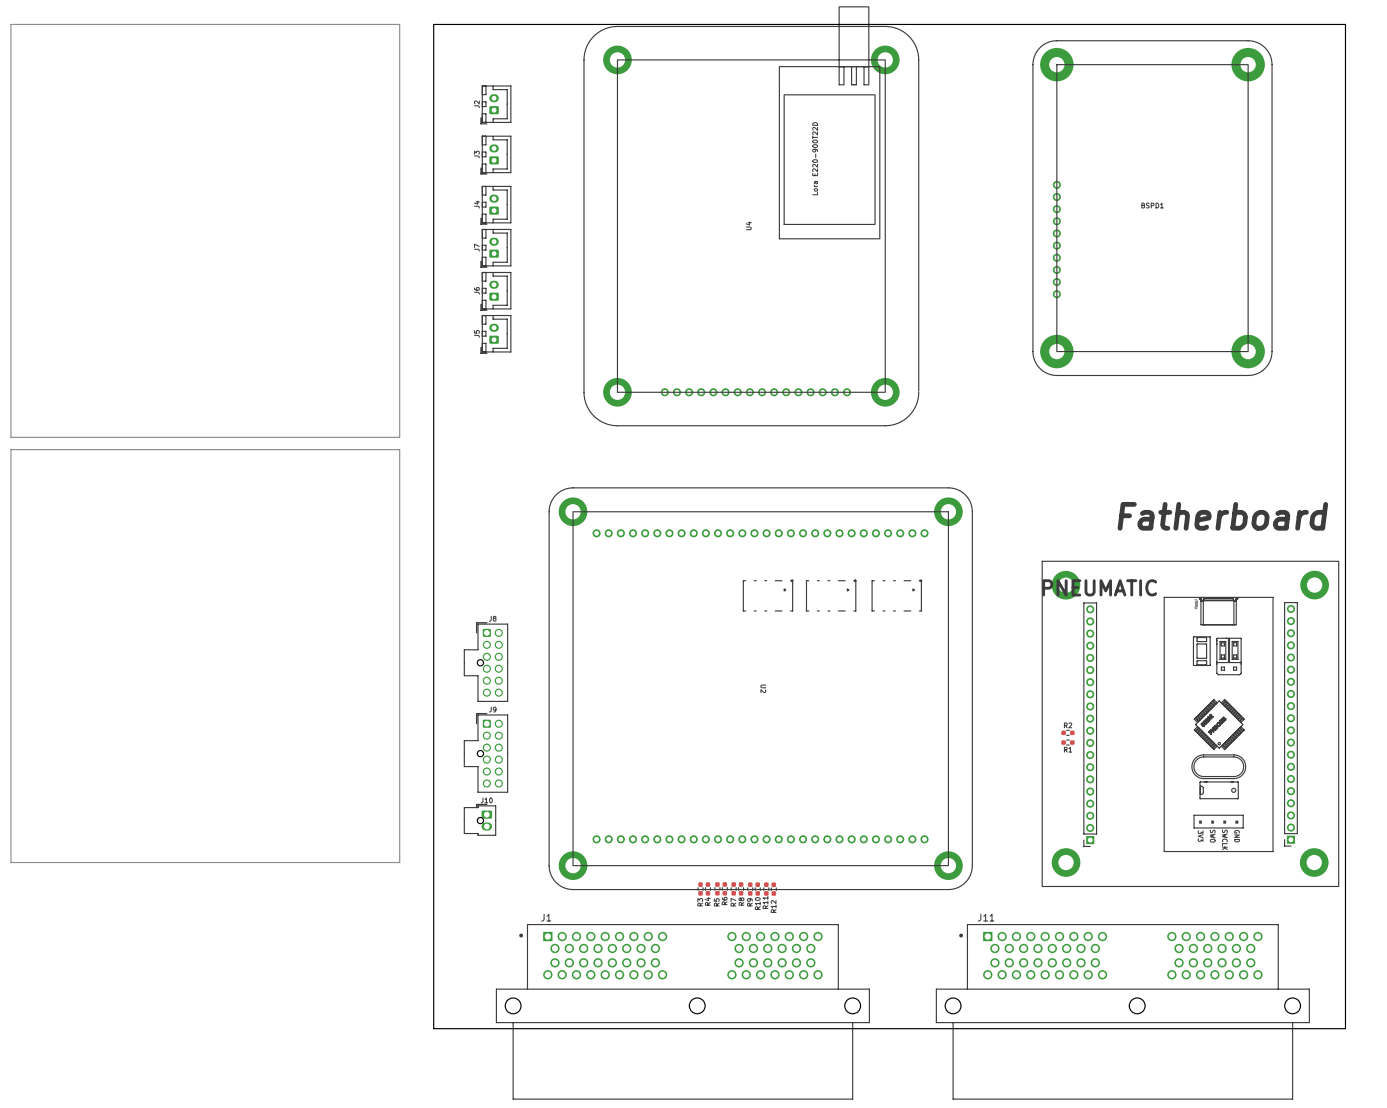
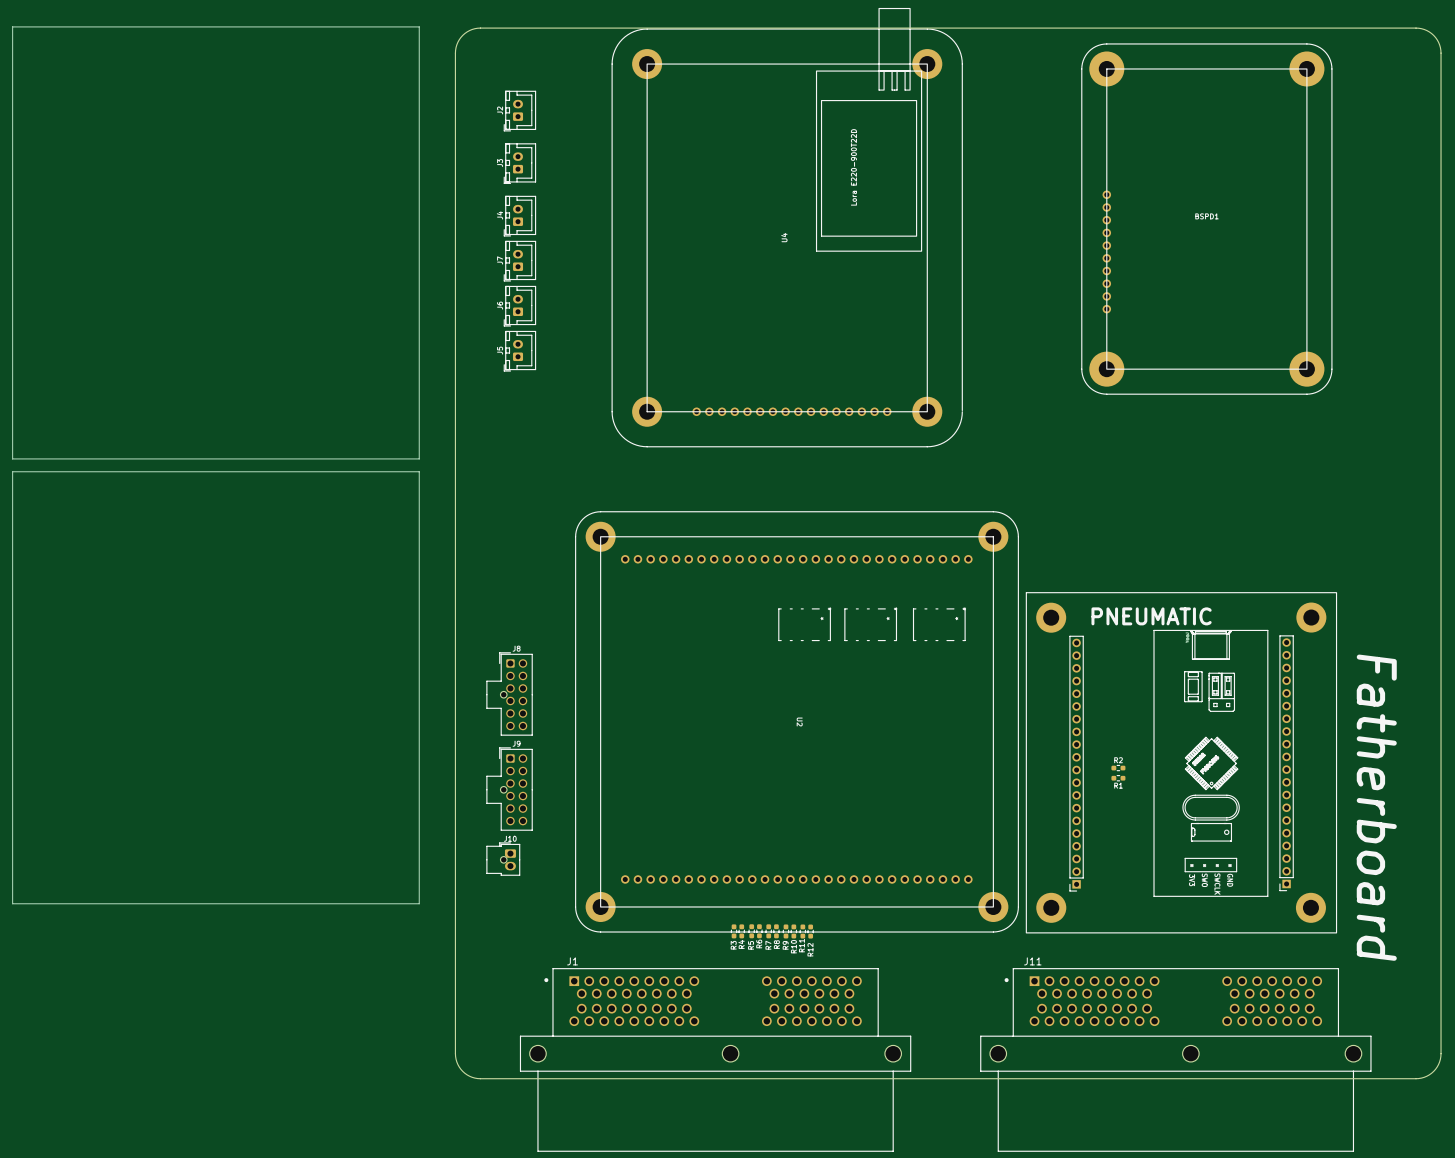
board edge: (433, 24) (1345, 24) (1345, 1028) (433, 1028) (433, 24) -> (480, 28) (472, 29) (462, 35) (456, 44) (455, 53) (455, 1053) (456, 1061) (462, 1071) (472, 1077) (480, 1078) (1416, 1078) (1426, 1076) (1433, 1071) (1438, 1064) (1441, 1053) (1441, 53) (1438, 42) (1433, 35) (1426, 30) (1416, 28) (480, 28)
text: Fatherboard (1222, 516) -> none
part position: (1190, 723) -> (1181, 762)
text: none -> Fatherboard (1376, 807)

